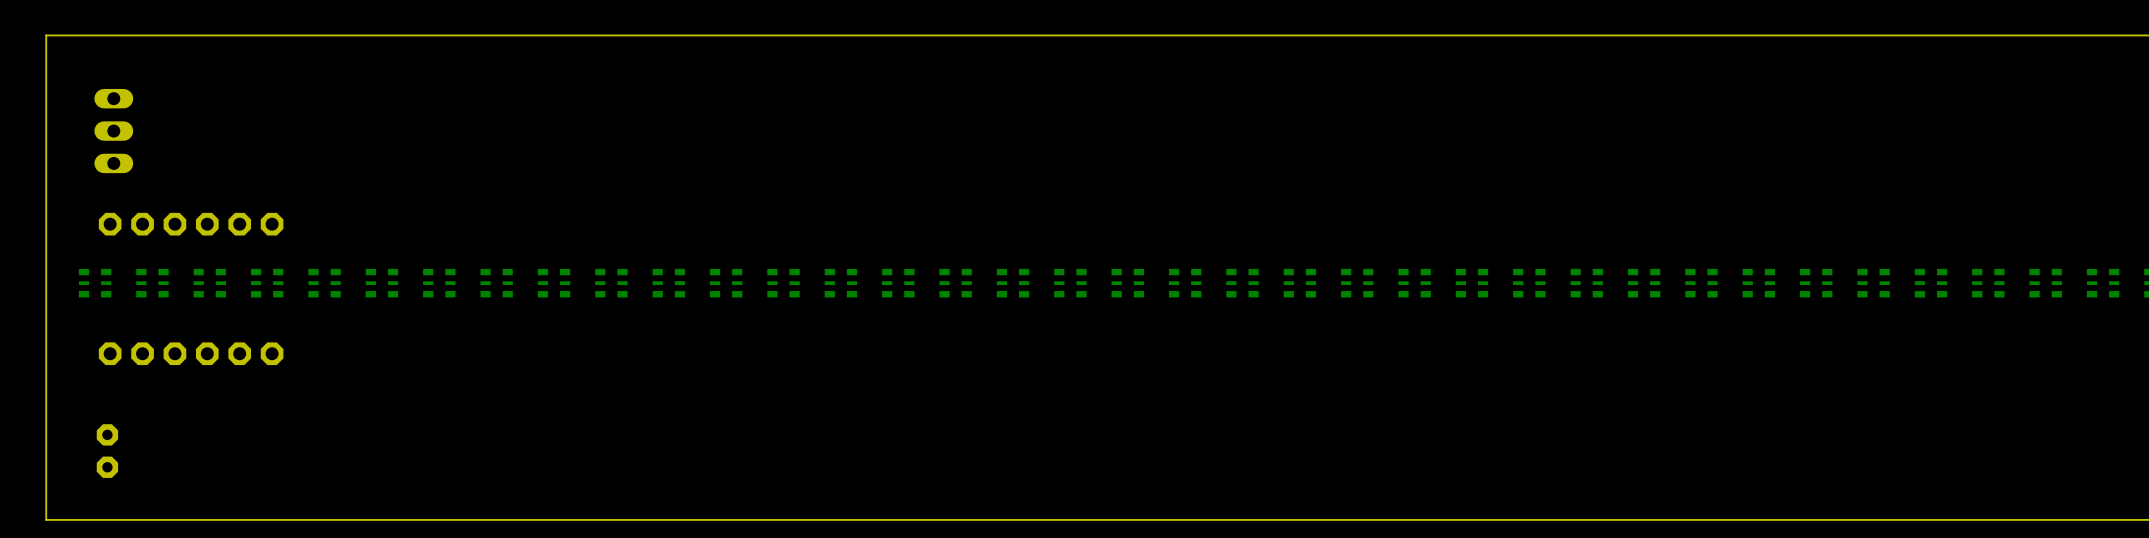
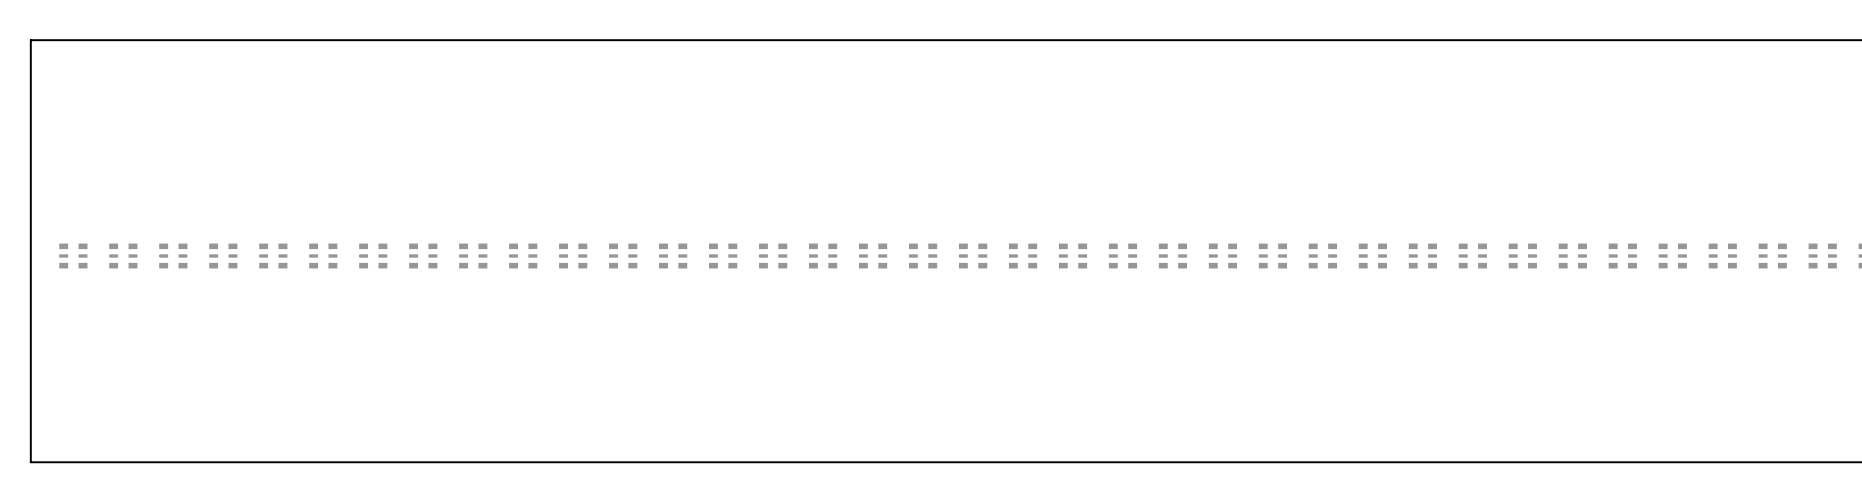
part: (113, 131) -> none
part: (191, 224) -> none
part: (191, 353) -> none
part: (107, 451) -> none

